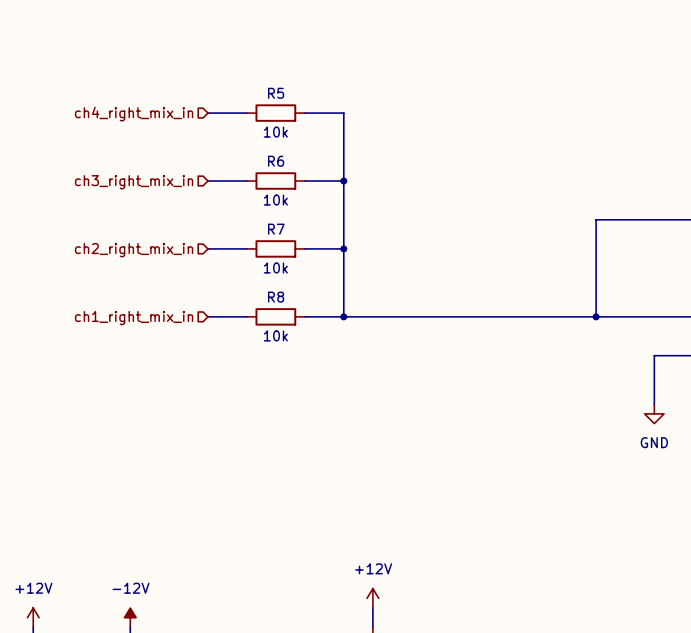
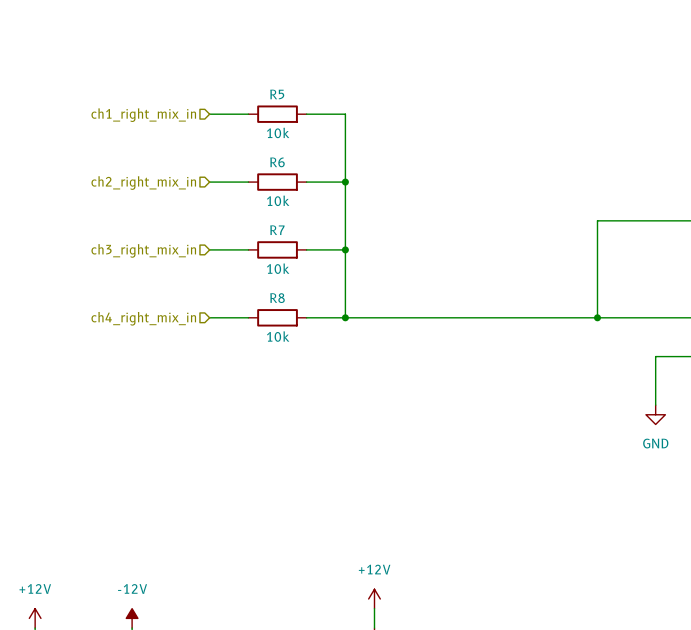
hierarchical label: ch4_right_mix_in (134, 114) -> ch1_right_mix_in (143, 115)
hierarchical label: ch3_right_mix_in (134, 182) -> ch2_right_mix_in (143, 183)
hierarchical label: ch2_right_mix_in (134, 250) -> ch3_right_mix_in (143, 250)
hierarchical label: ch1_right_mix_in (134, 318) -> ch4_right_mix_in (143, 318)

